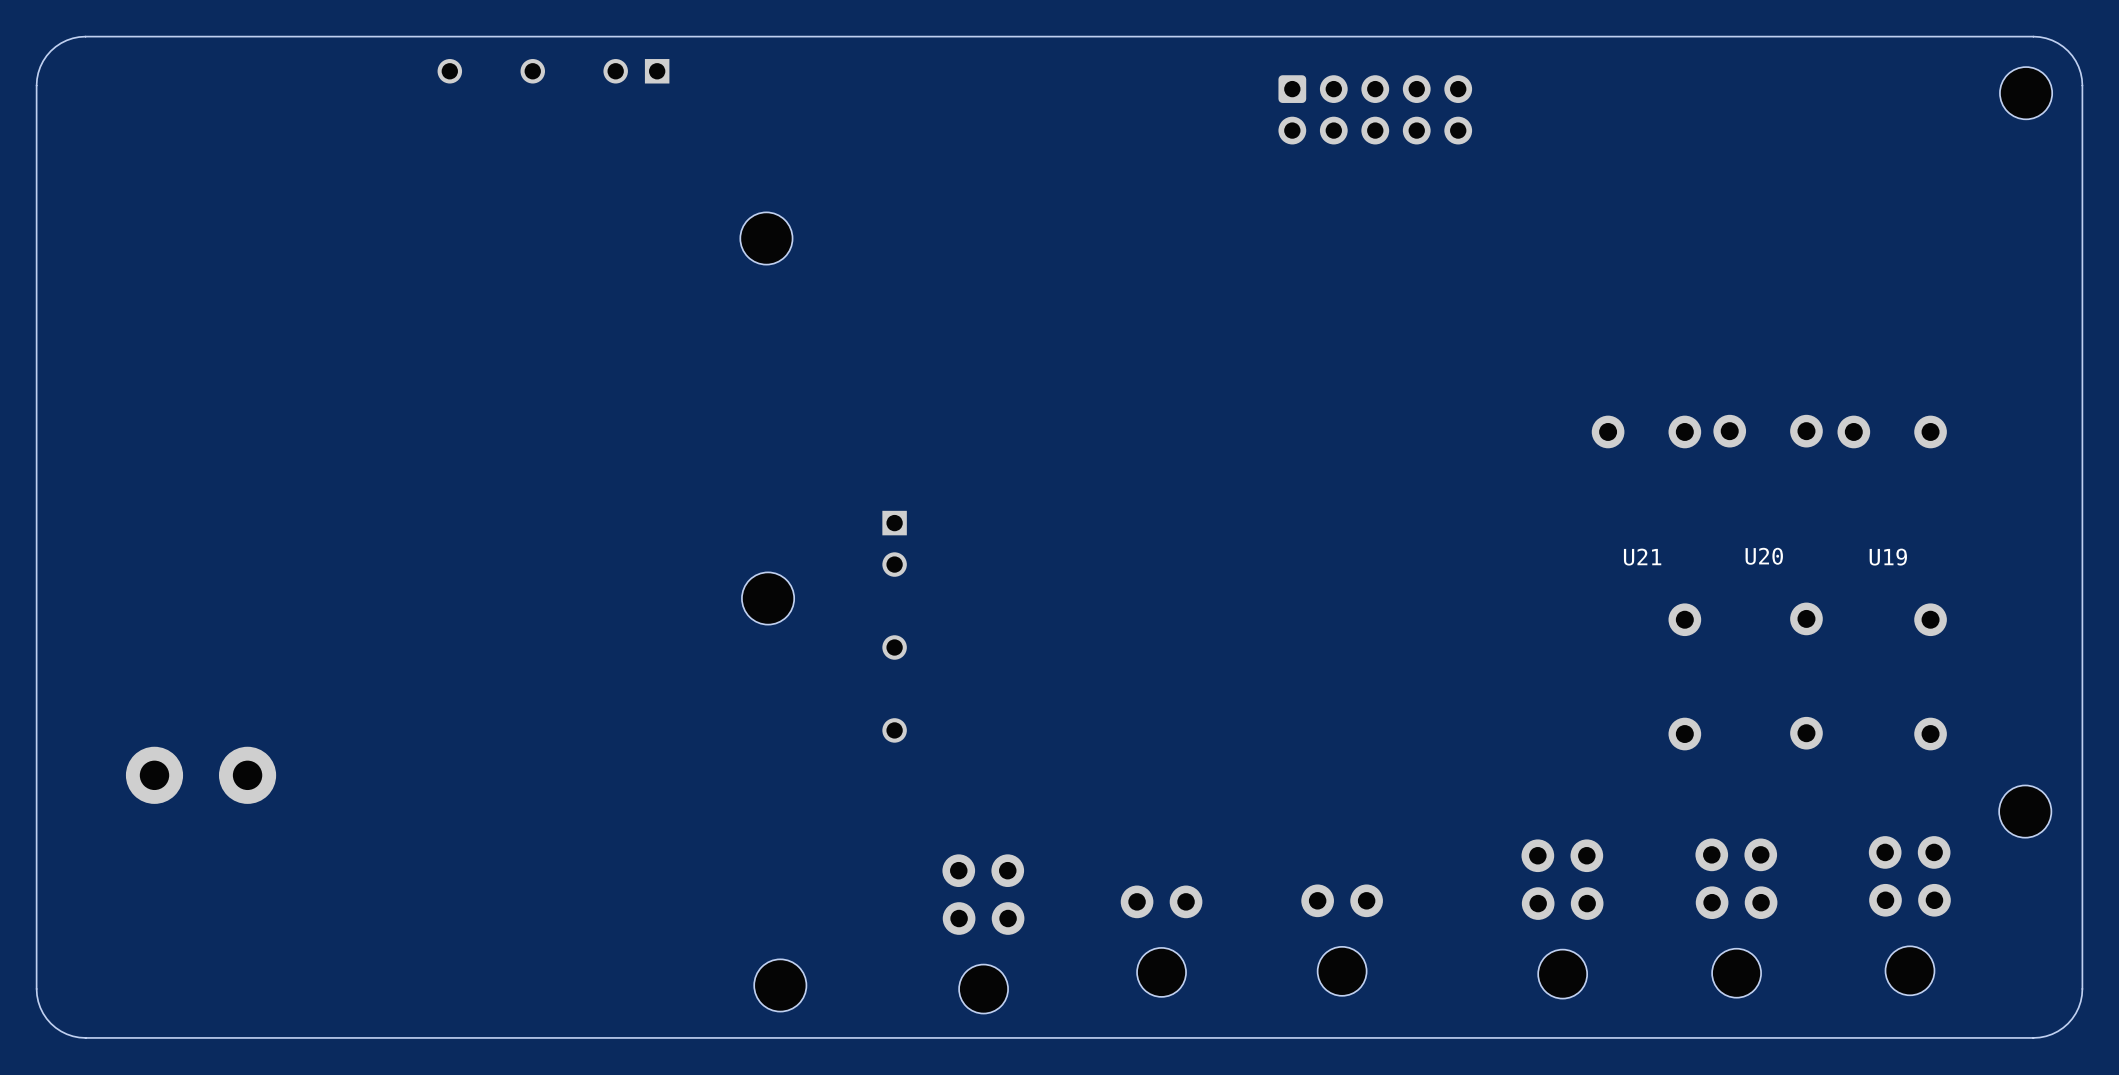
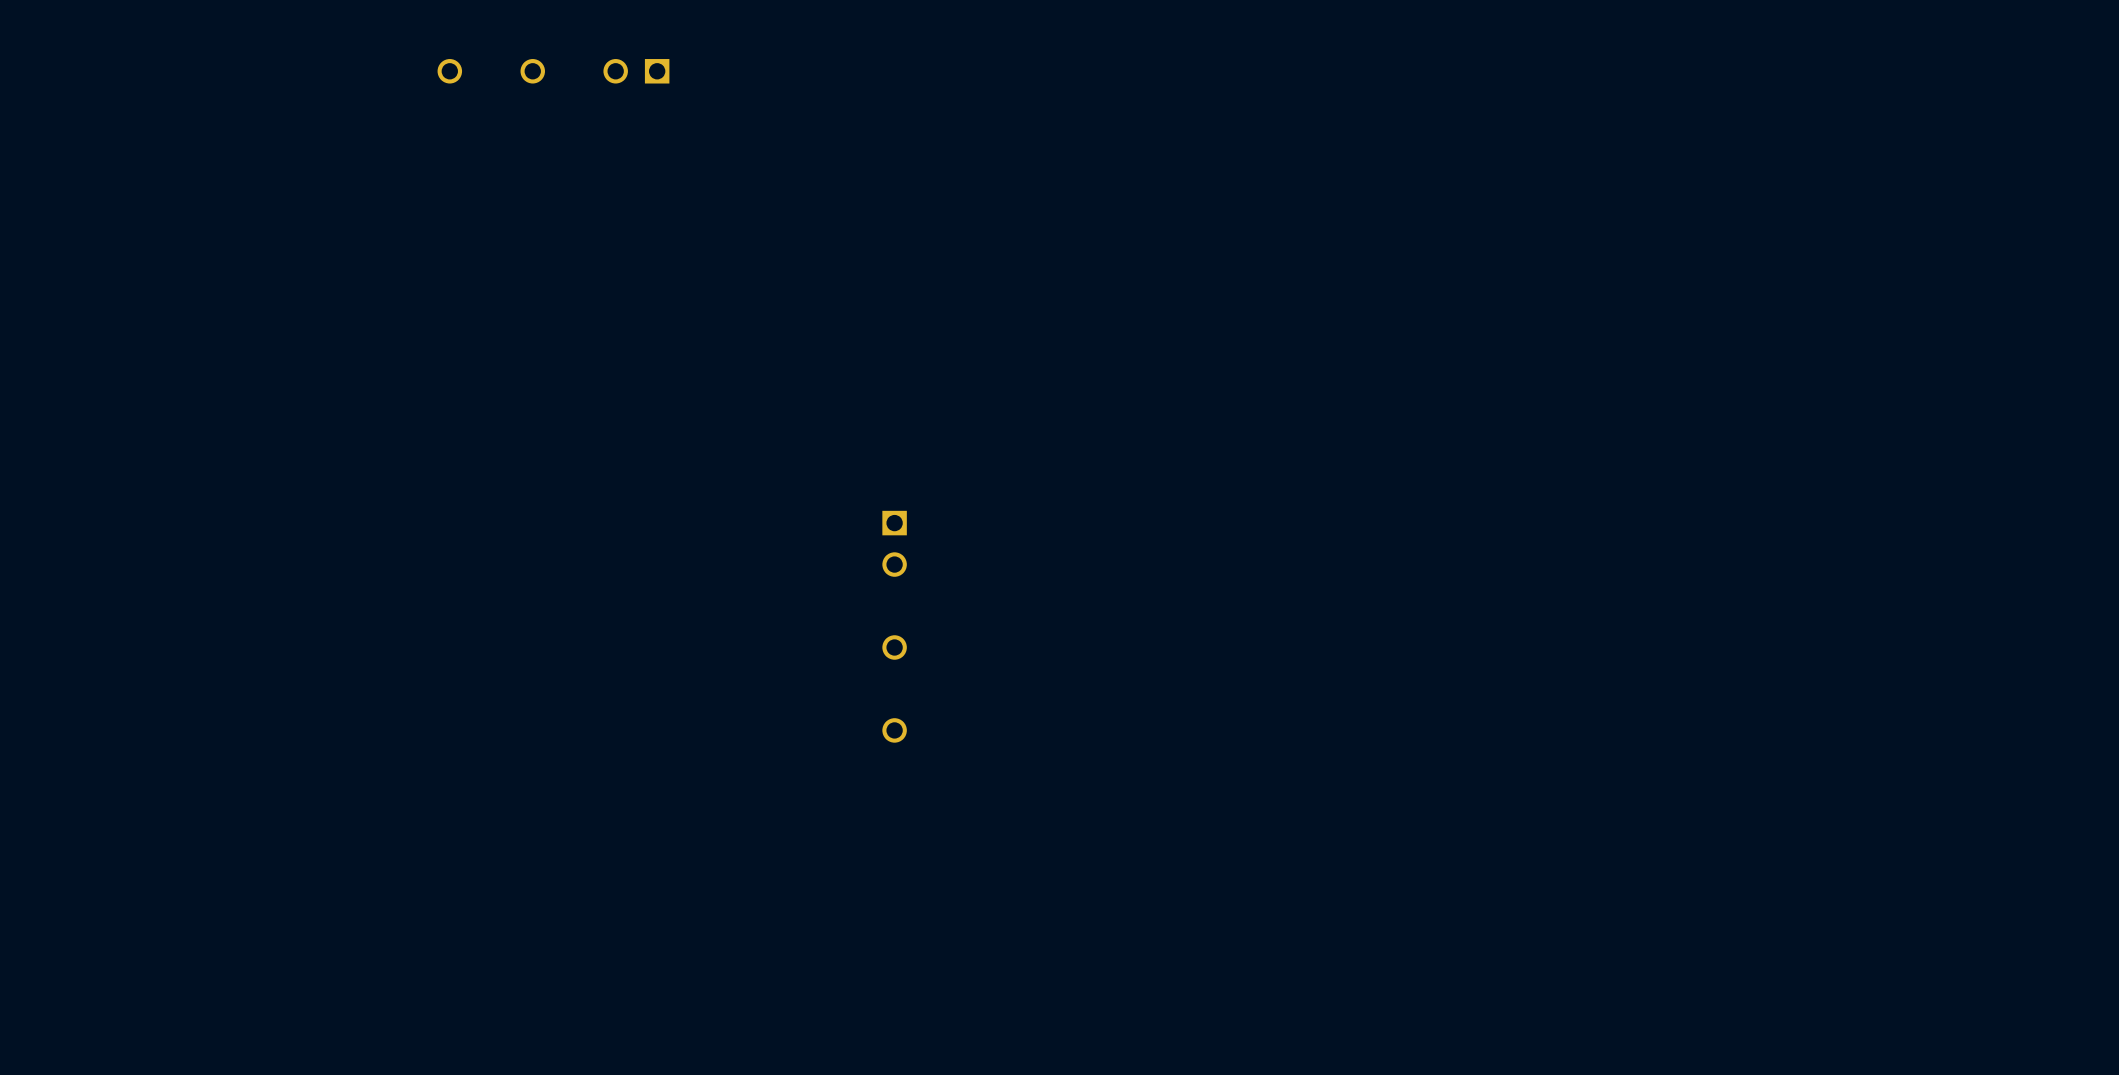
board edge: (2033, 36) (85, 36) (66, 40) (55, 46) (43, 61) (38, 72) (36, 85) (36, 988) (40, 1007) (46, 1018) (55, 1027) (66, 1034) (85, 1037) (2033, 1037) (2052, 1034) (2063, 1027) (2075, 1013) (2080, 1001) (2082, 988) (2082, 85) (2078, 66) (2068, 50) (2052, 40) (2033, 36) -> none
part: (2026, 93) -> none
part: (1375, 109) -> none
part: (766, 238) -> none
U20: (1768, 582) -> none
U21: (1646, 583) -> none
U19: (1892, 583) -> none
part: (768, 598) -> none
part: (201, 775) -> none
part: (2025, 811) -> none
part: (1909, 915) -> none
part: (1736, 918) -> none
part: (1562, 919) -> none
part: (983, 933) -> none
part: (1342, 940) -> none
part: (1161, 941) -> none
part: (780, 985) -> none

